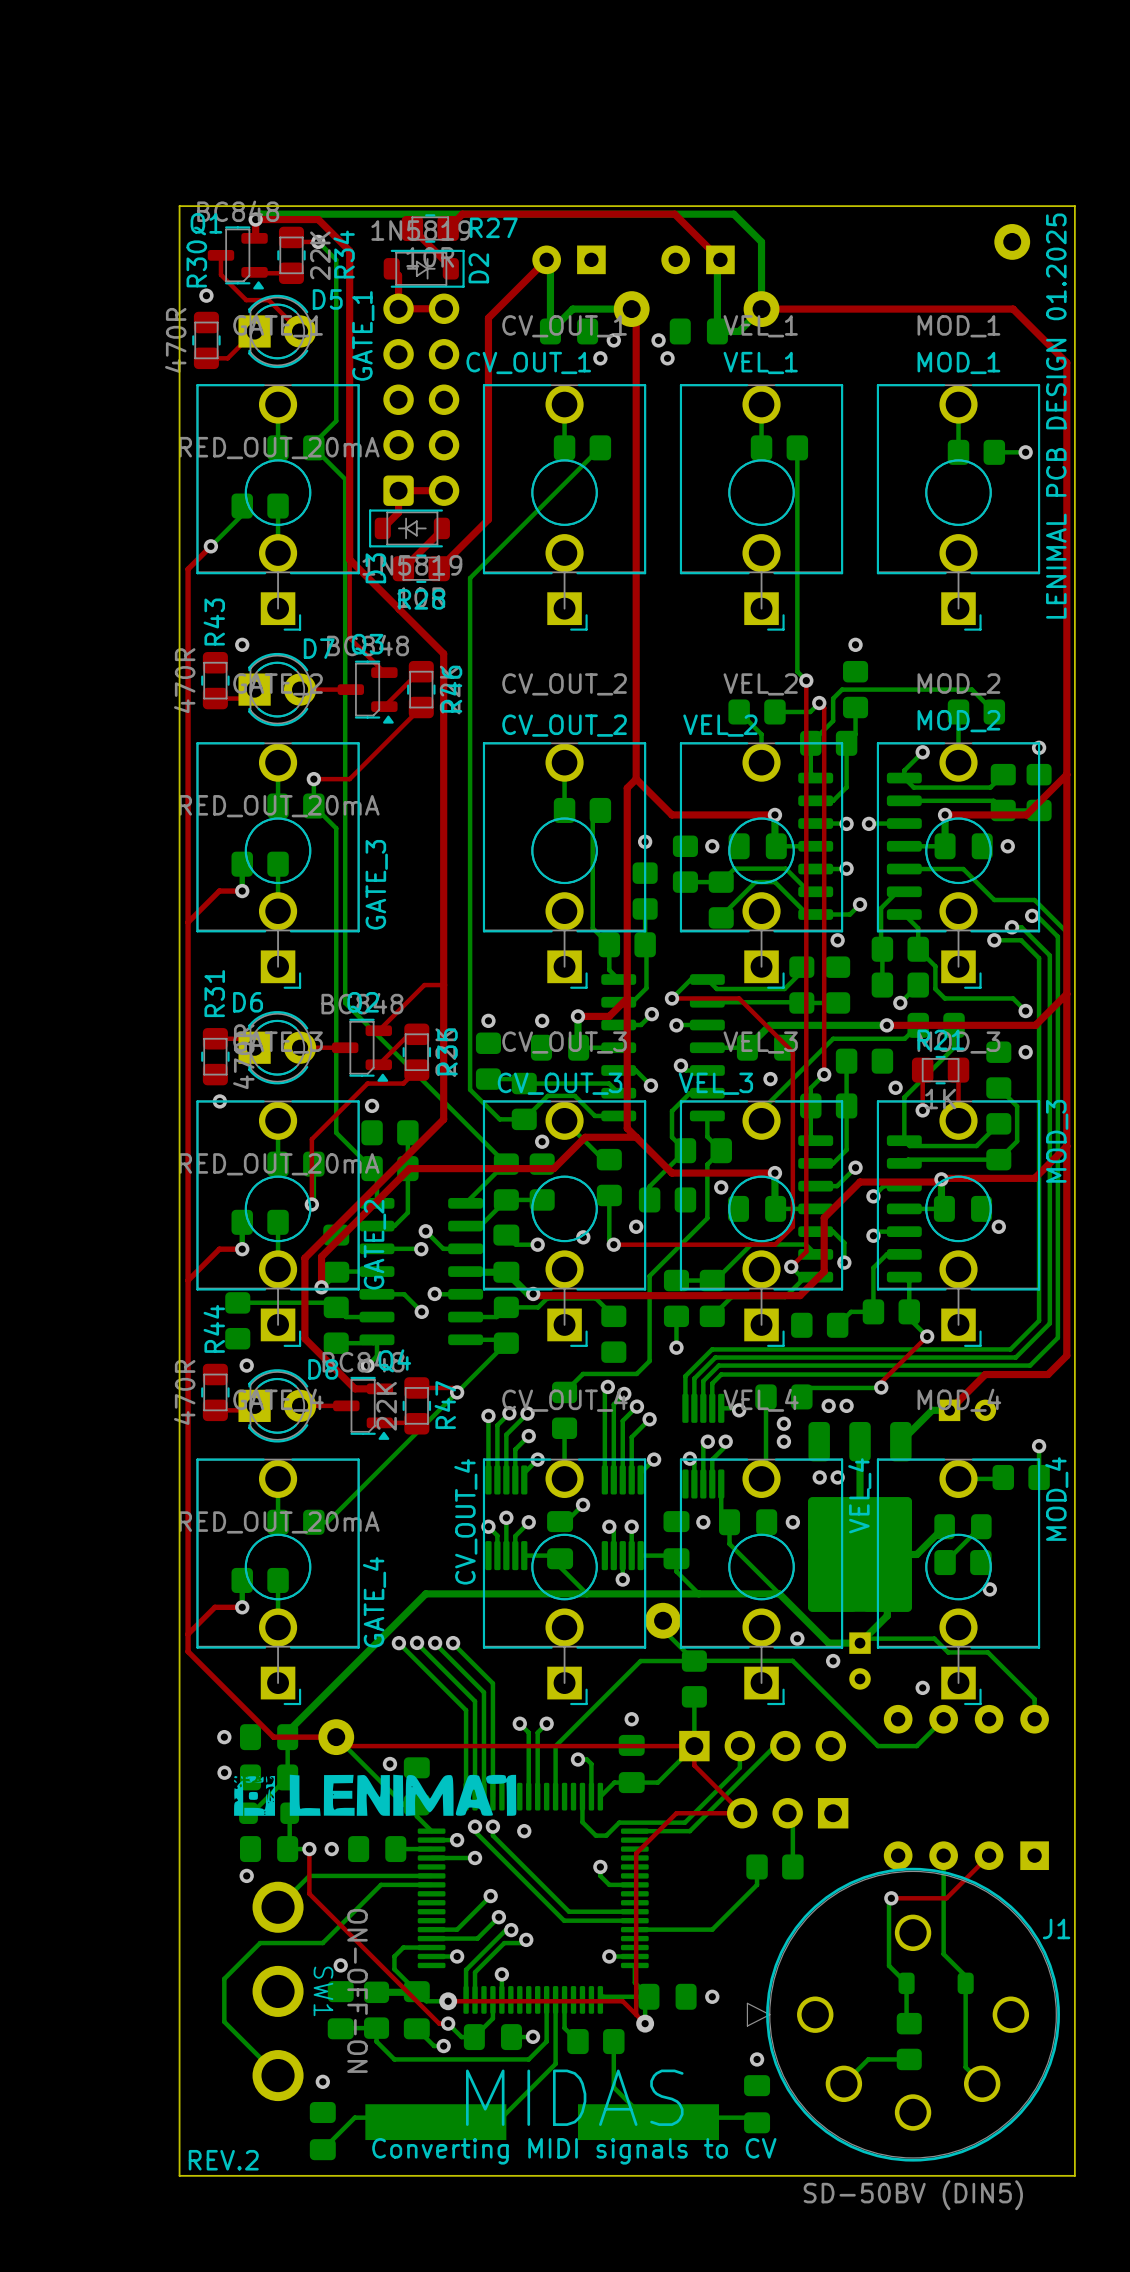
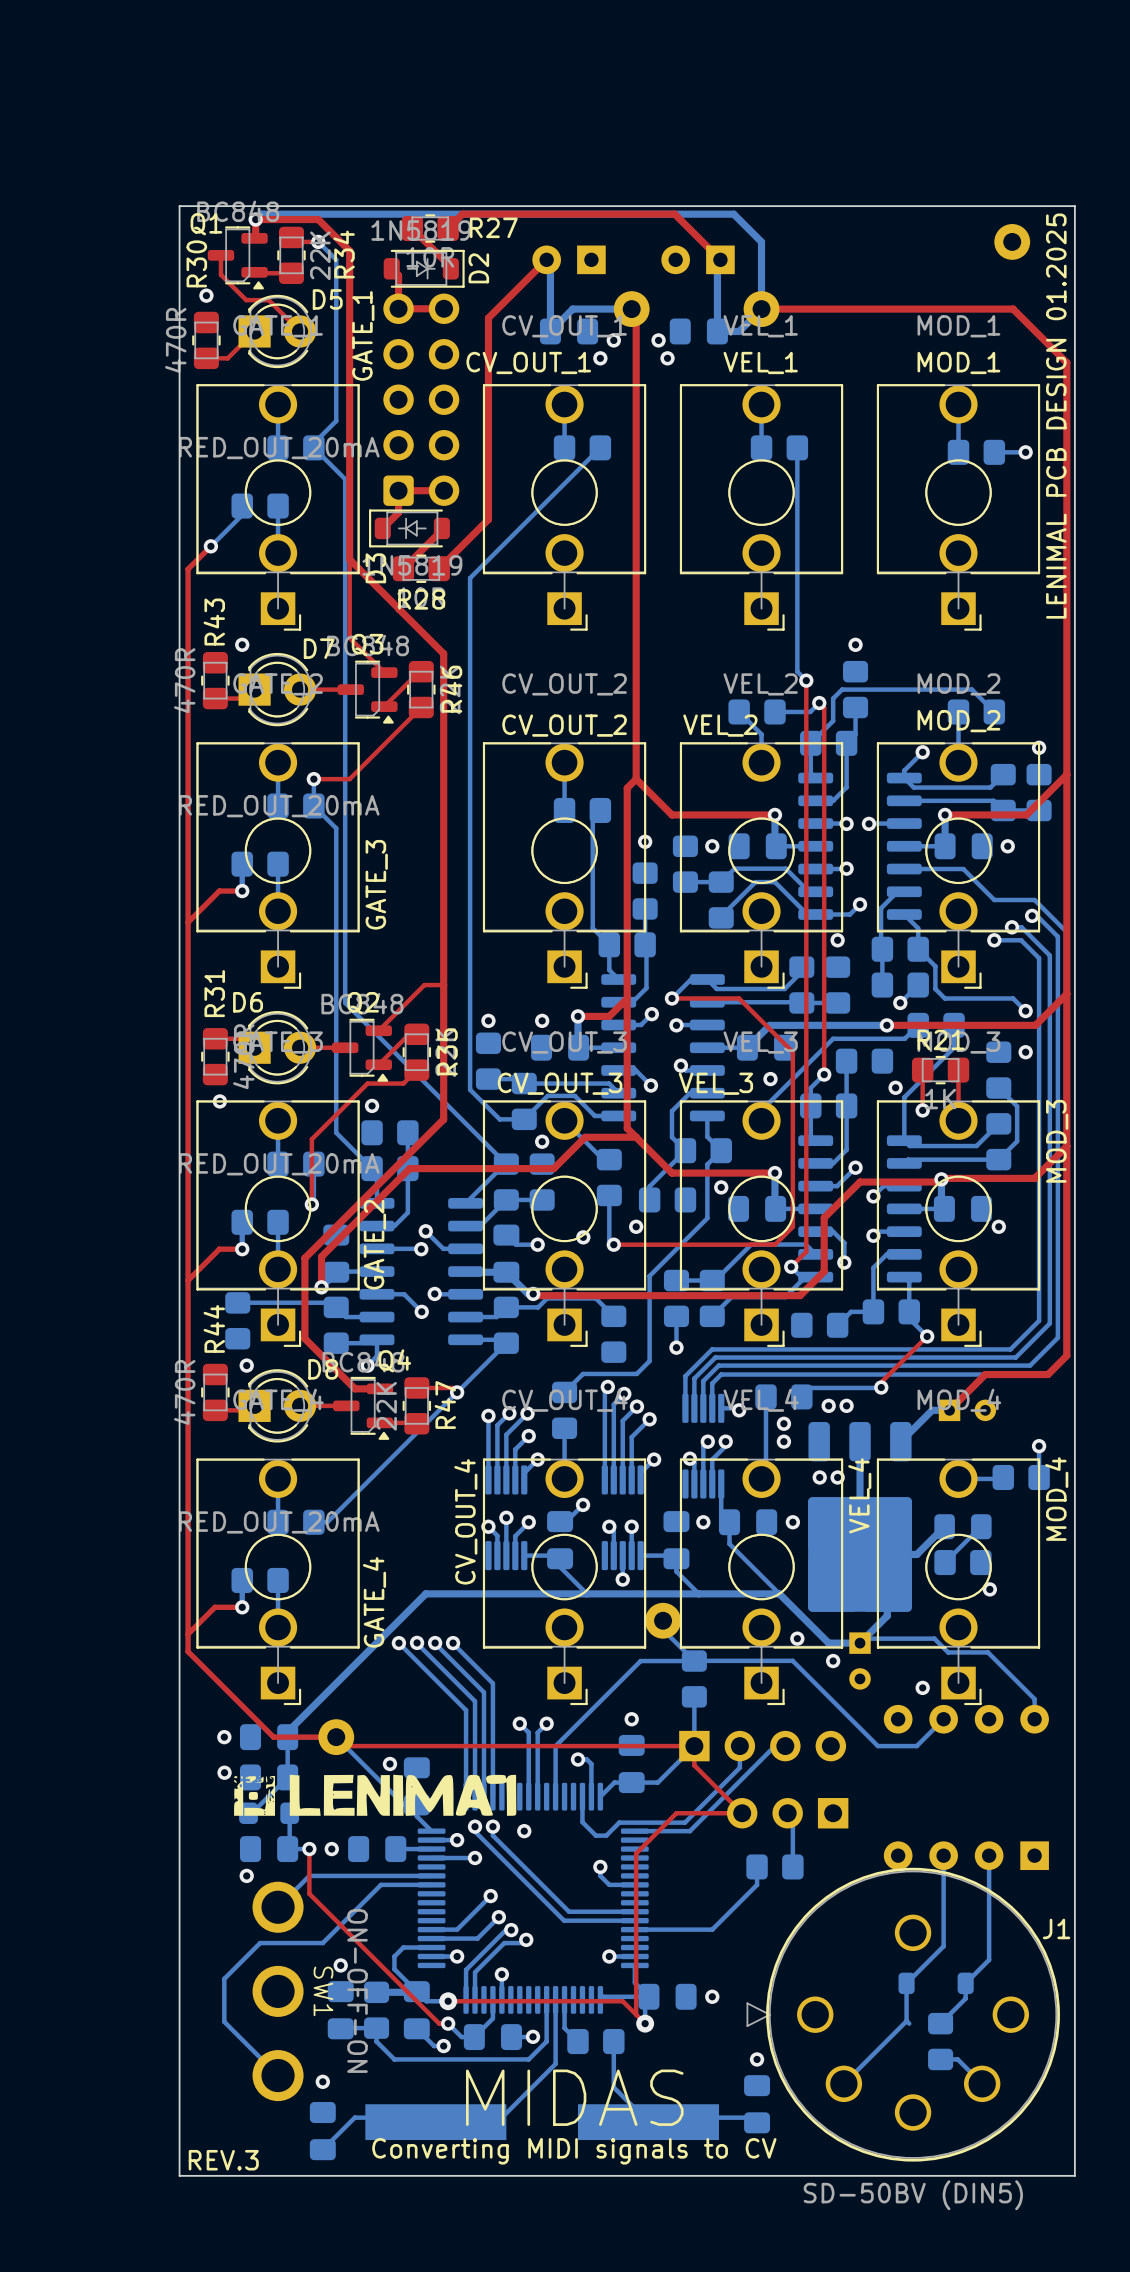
bottom track: none -> (989, 1855) (989, 1959) (965, 1983)
top track: (989, 1855) (946, 1898) (891, 1898) -> none
bottom track: (891, 1898) (889, 1900) (889, 1965) (906, 1983) -> none
via: (891, 1898) -> none
bottom track: (943, 1946) (943, 1954) (965, 1976) (965, 1983) -> (943, 1946) (906, 1983)
bottom track: (965, 1998) (965, 2067) -> (965, 1998) (940, 2023)
part position: (909, 2041) -> (940, 2041)
bottom track: (868, 2059) (909, 2059) -> (868, 2059) (906, 2021)
bottom track: none -> (940, 2059) (957, 2059) (965, 2067)
text: REV.2 (223, 2160) -> REV.3 (223, 2160)

